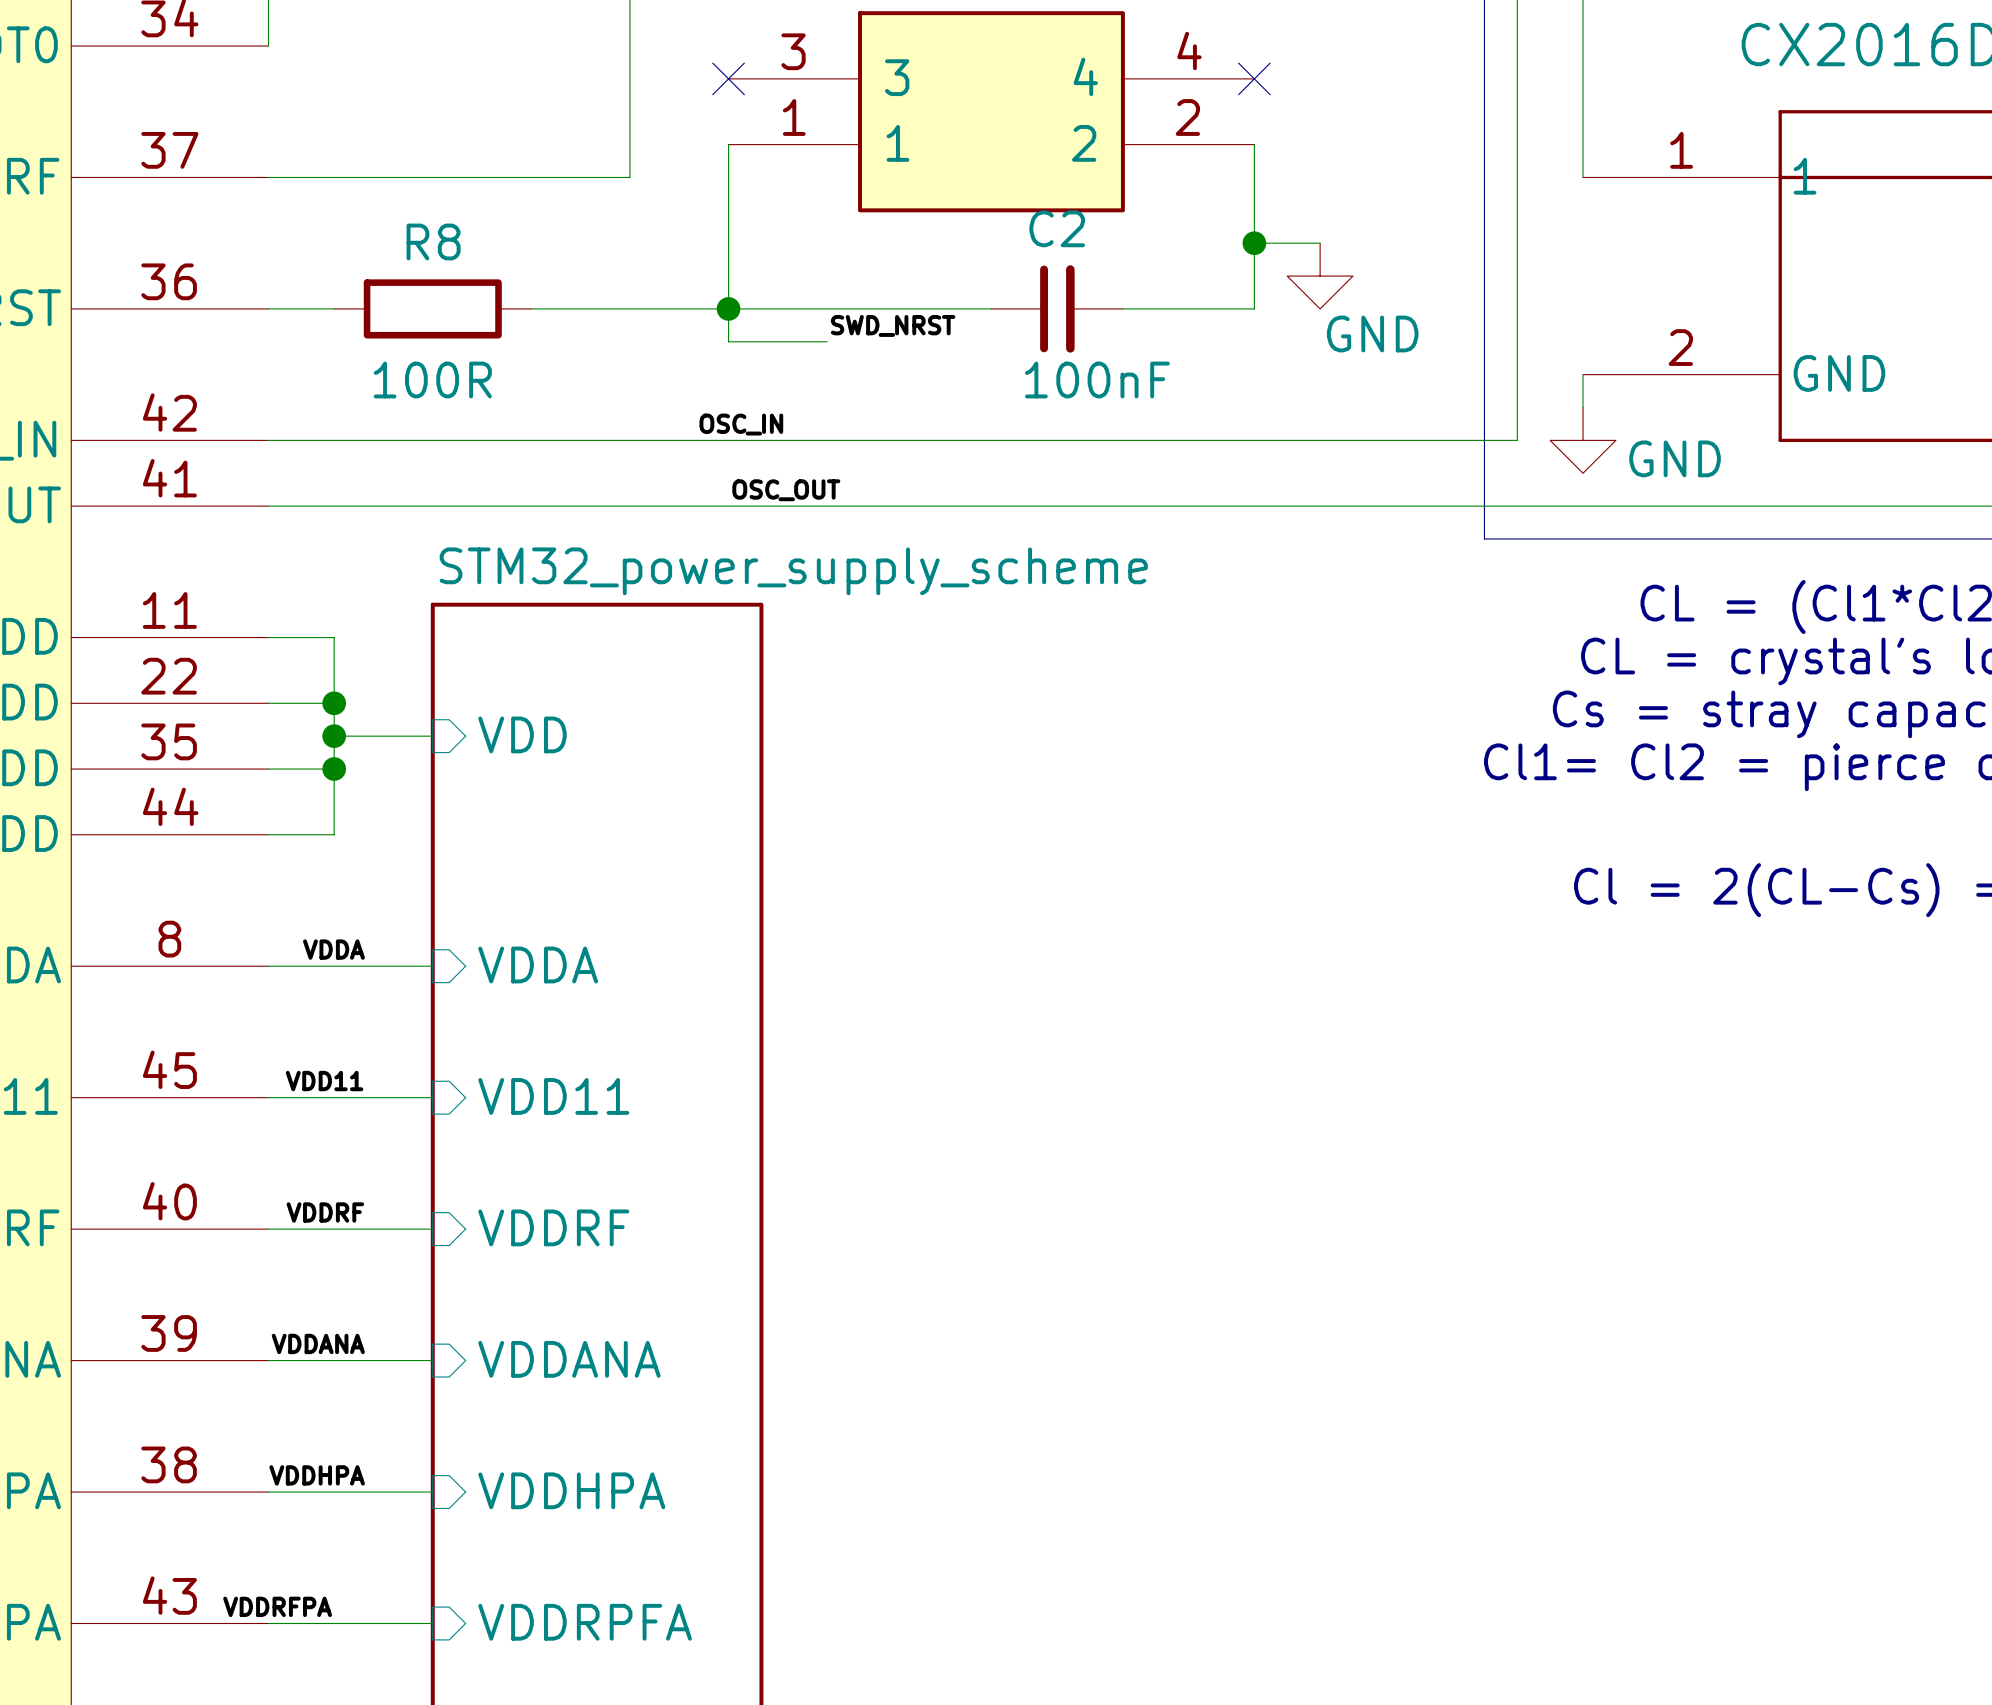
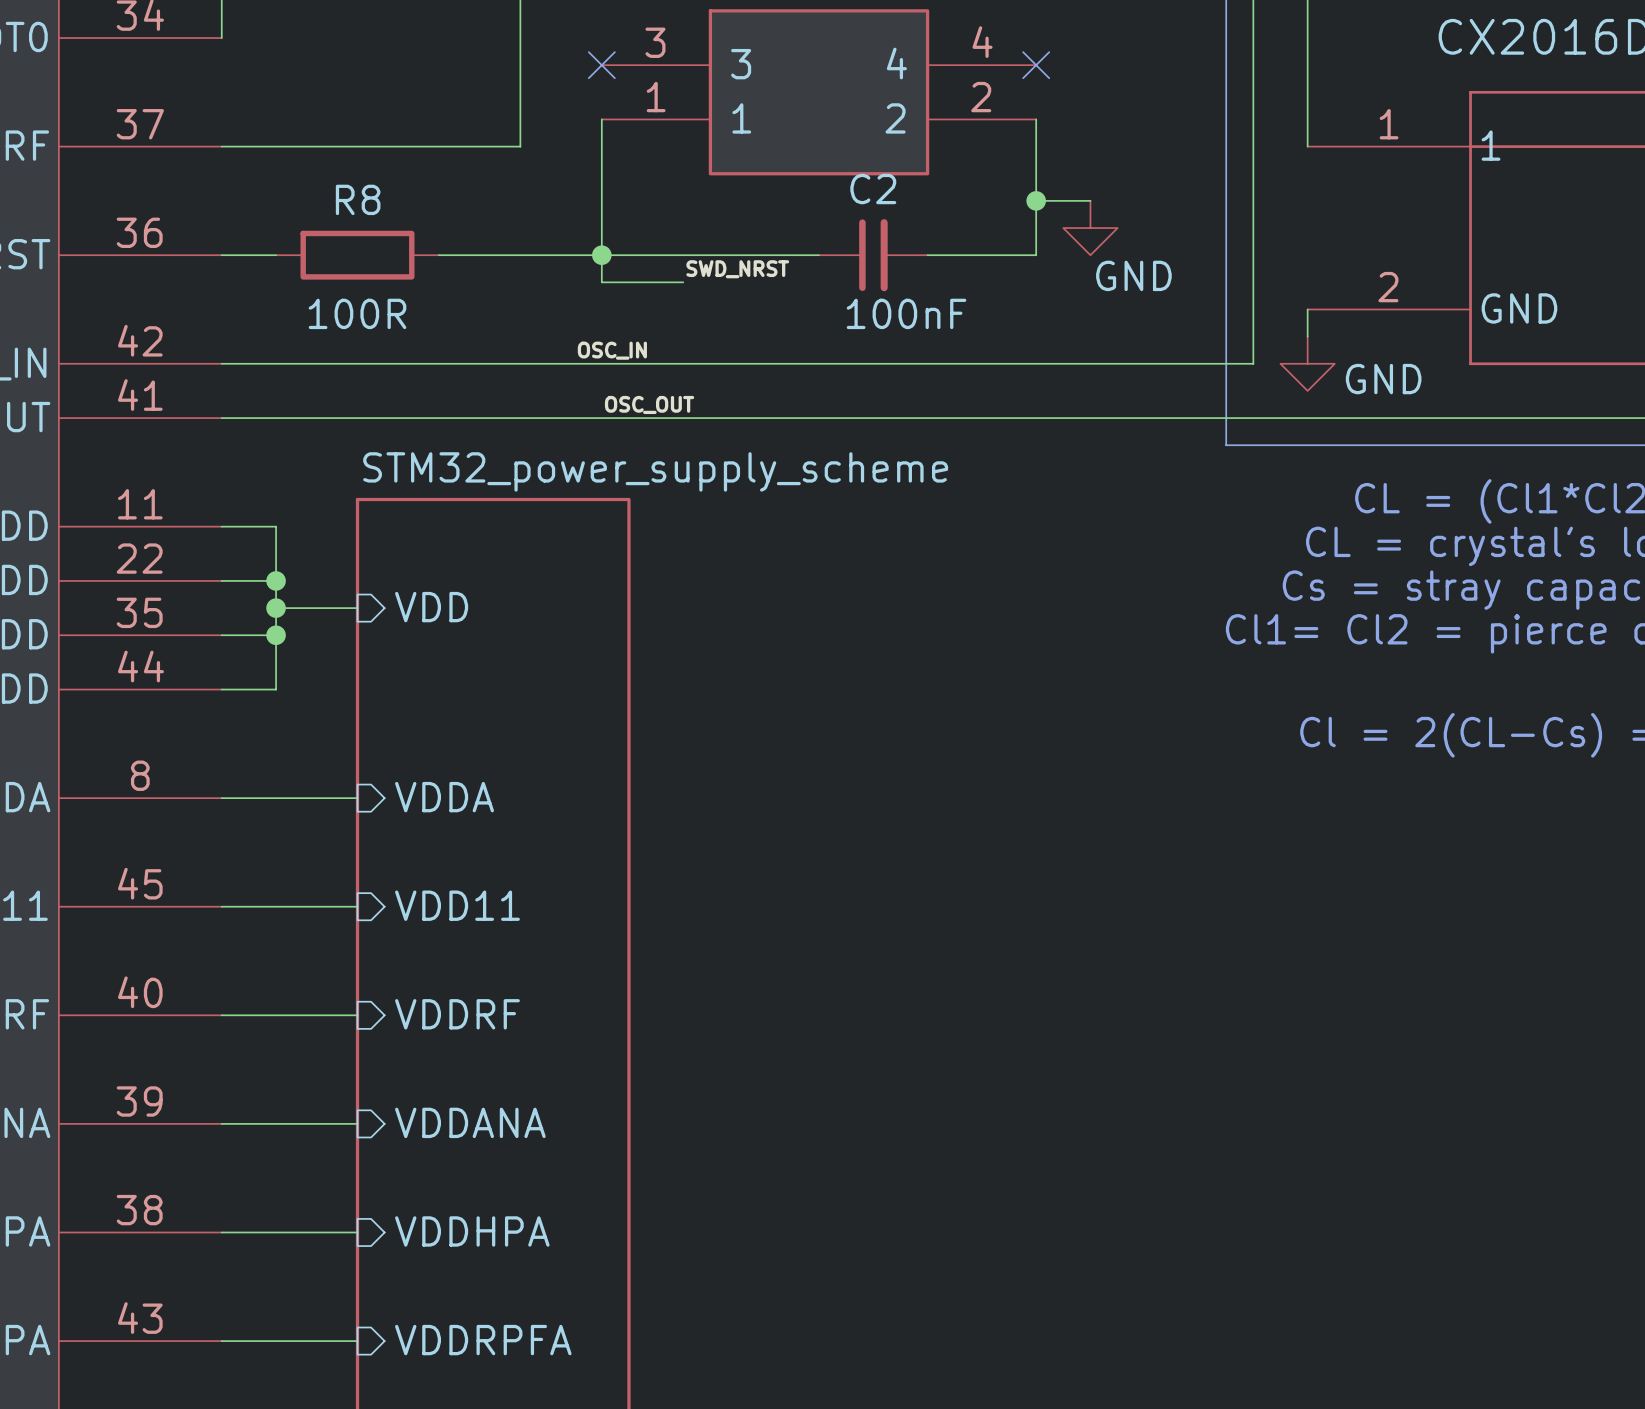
label: VDDA (333, 949) -> none
label: VDD11 (324, 1081) -> none
label: VDDRF (325, 1212) -> none
label: VDDANA (318, 1343) -> none
label: VDDHPA (317, 1475) -> none
label: VDDRFPA (277, 1606) -> none

